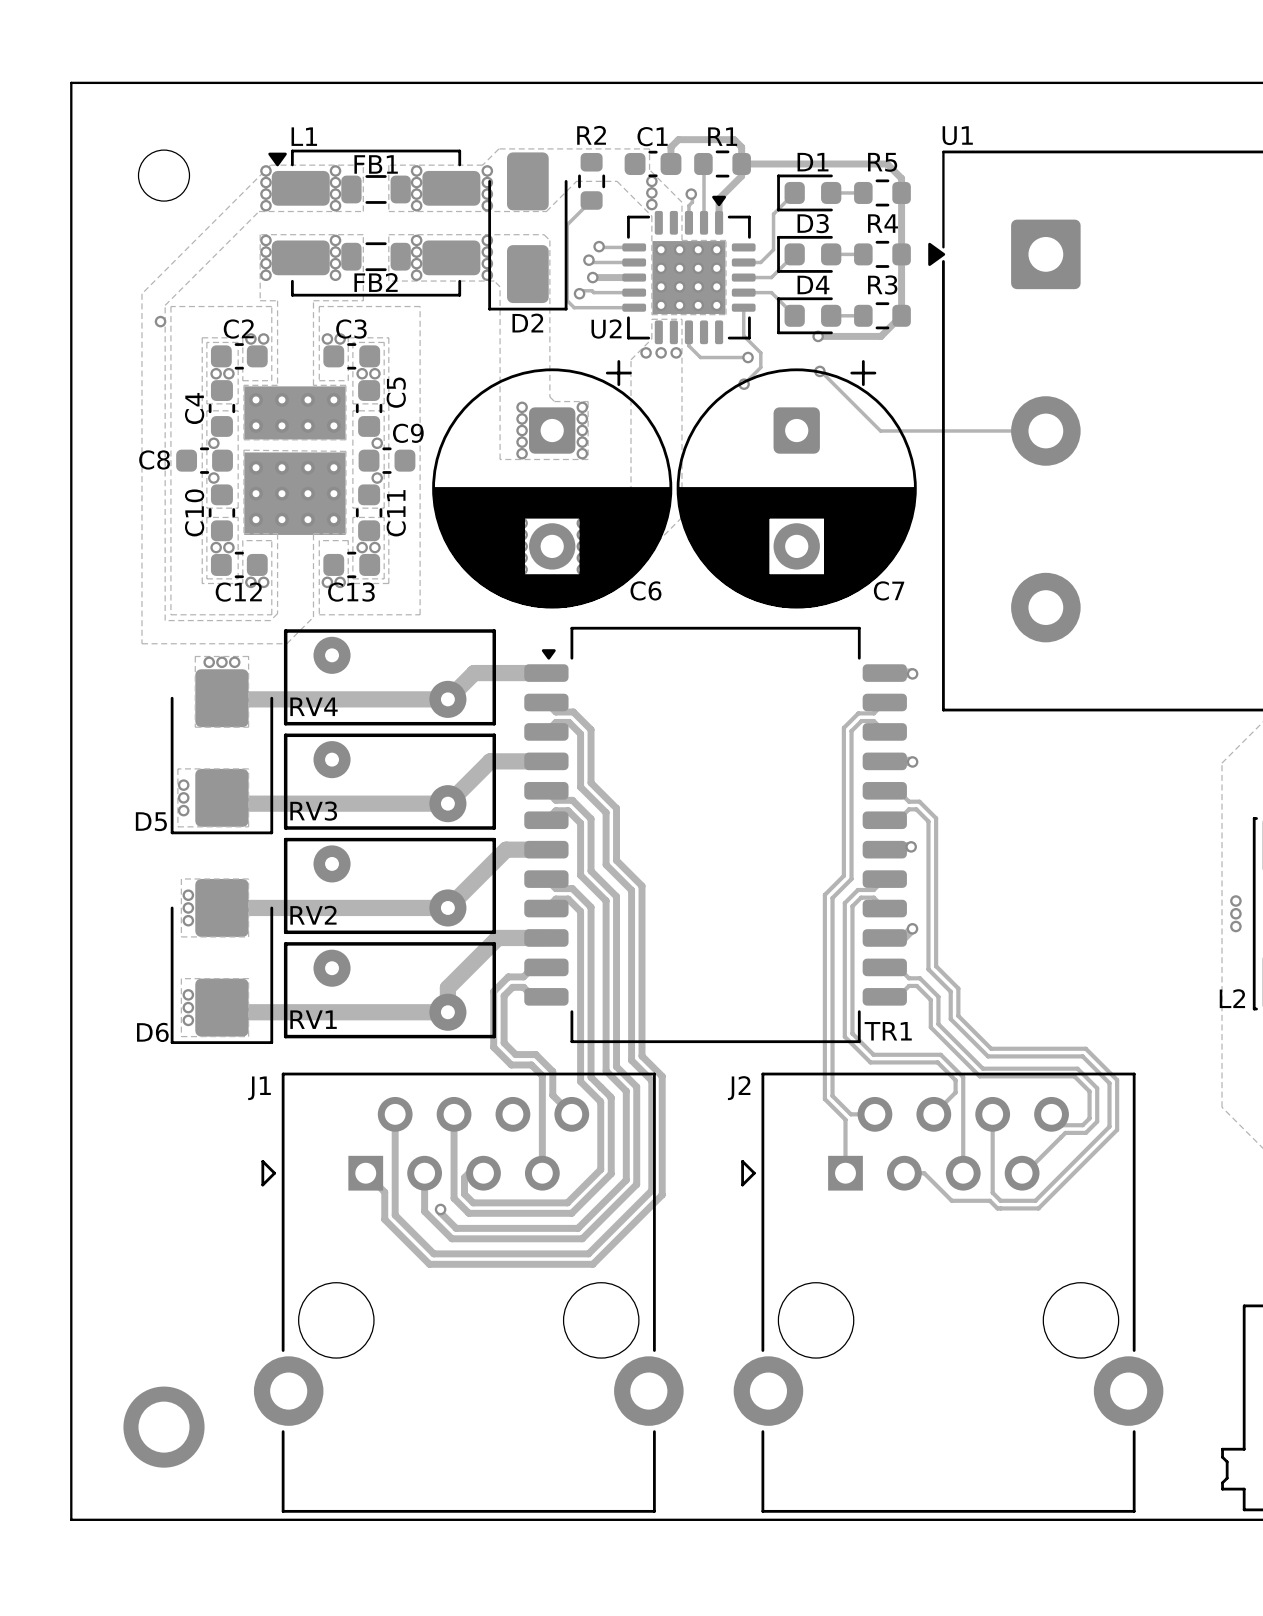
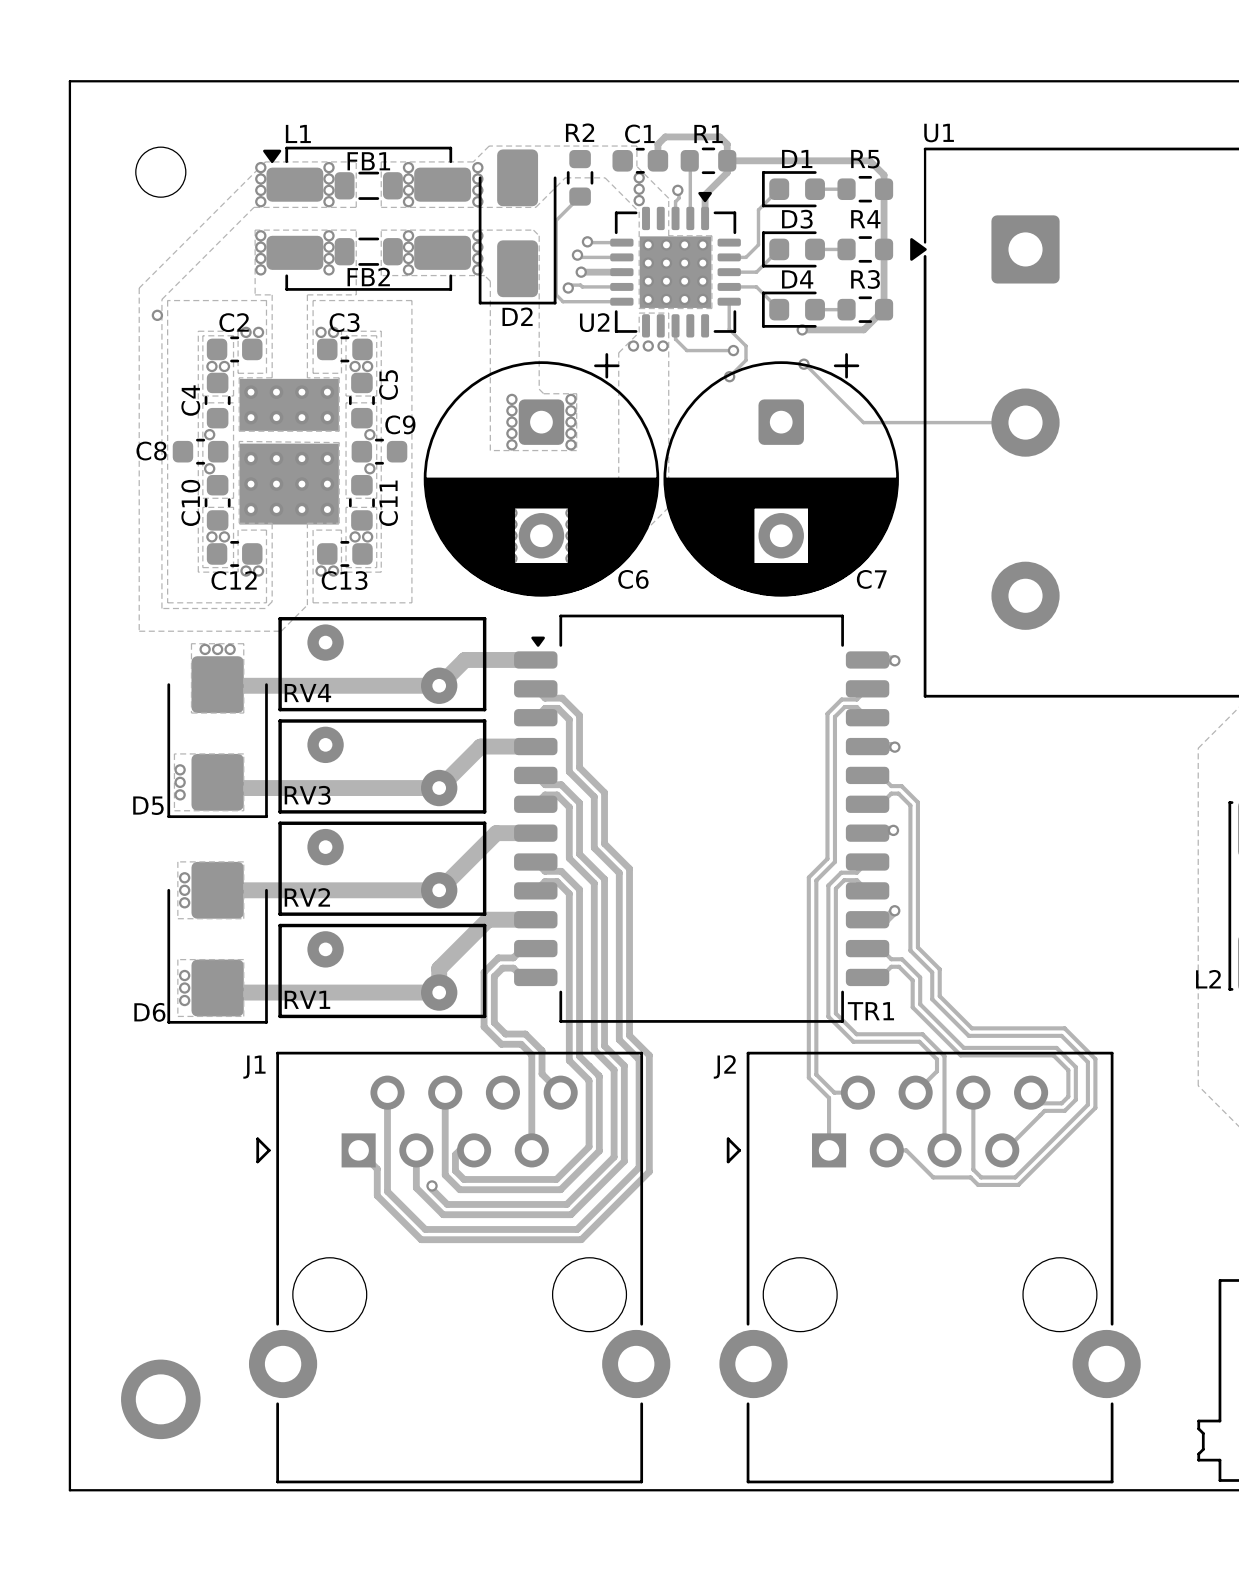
via: (1235, 901) -> none
via: (1235, 913) -> none
via: (1235, 926) -> none

